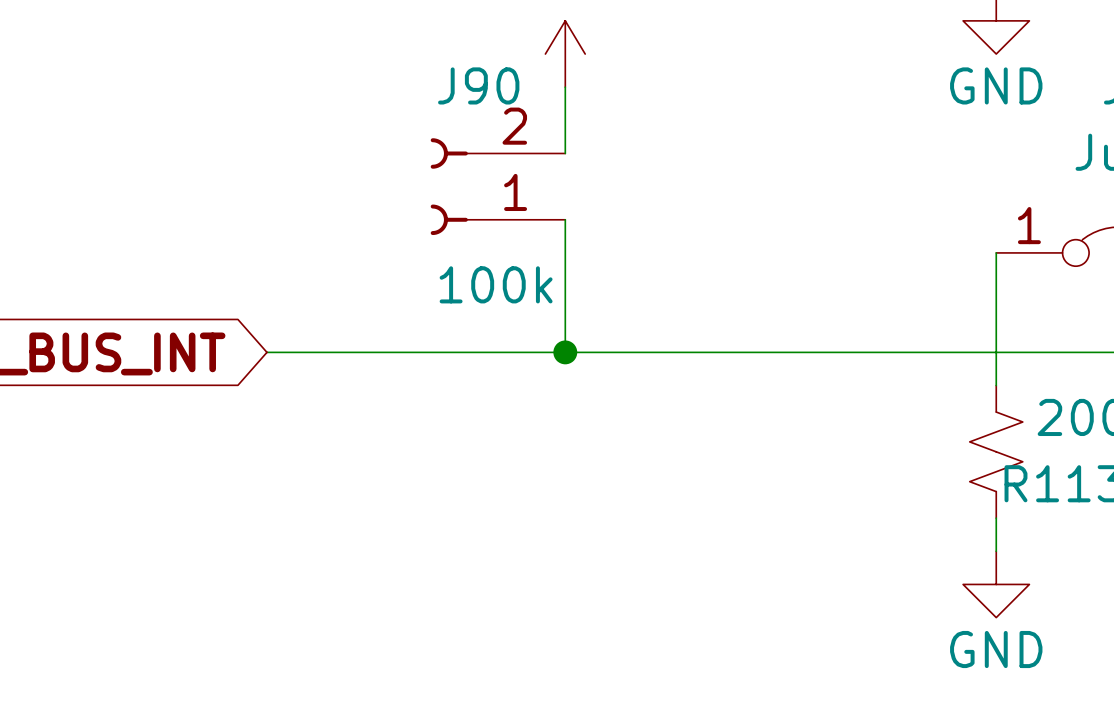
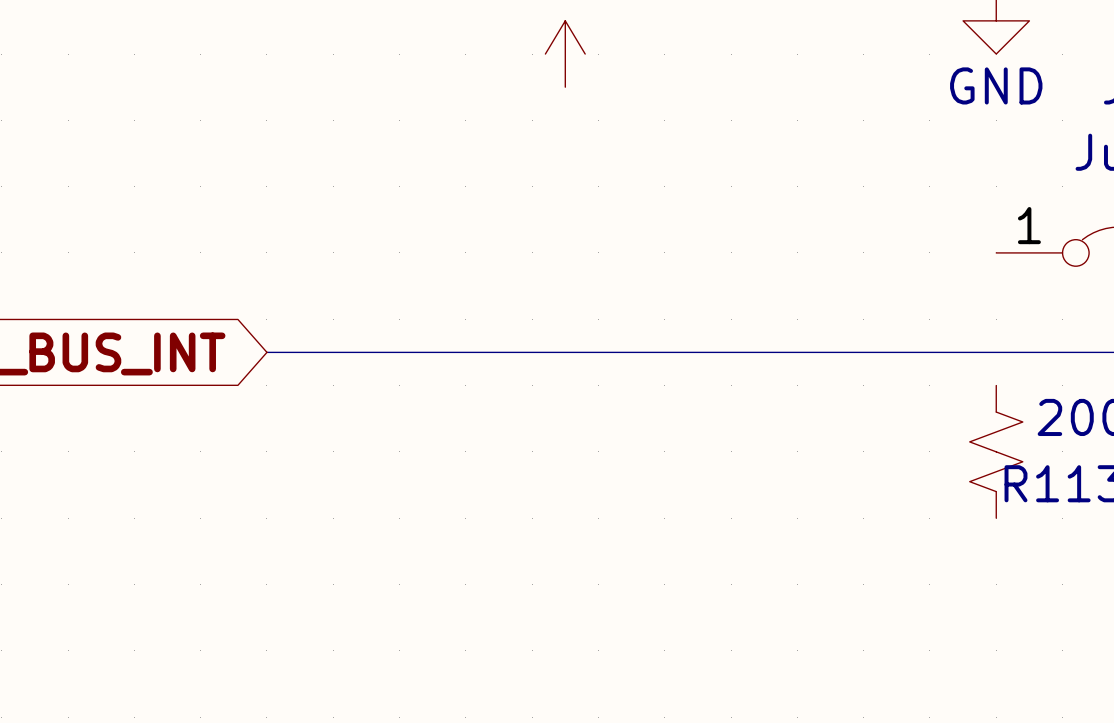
wire: (565, 87) (565, 153) -> none
J90: 100k (498, 186) -> none
wire: (565, 219) (565, 352) -> none
wire: (996, 252) (996, 385) -> none
junction: (565, 352) -> none
wire: (996, 518) (996, 551) -> none
power symbol: GND (996, 584) -> none

